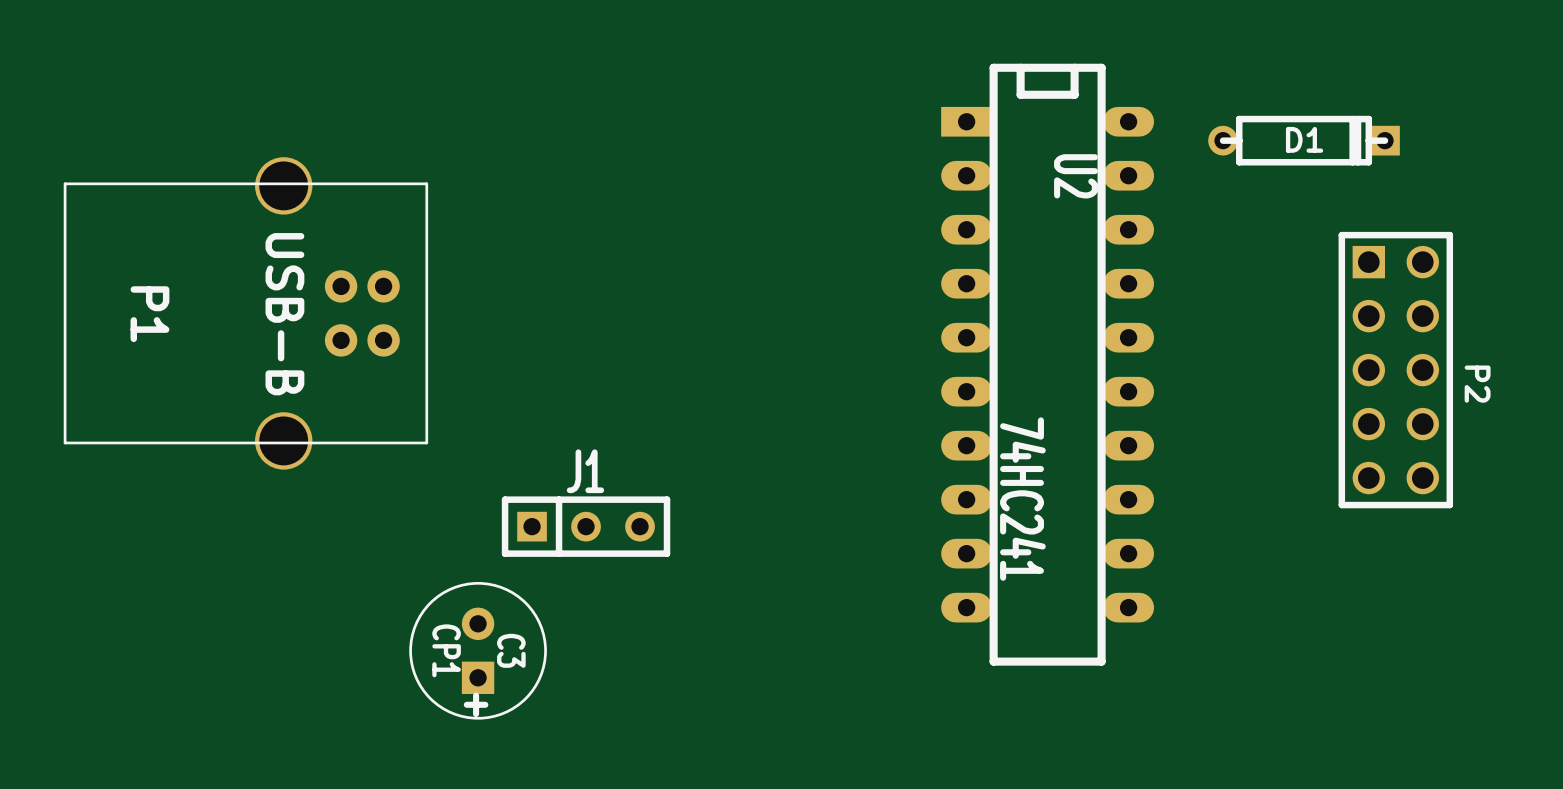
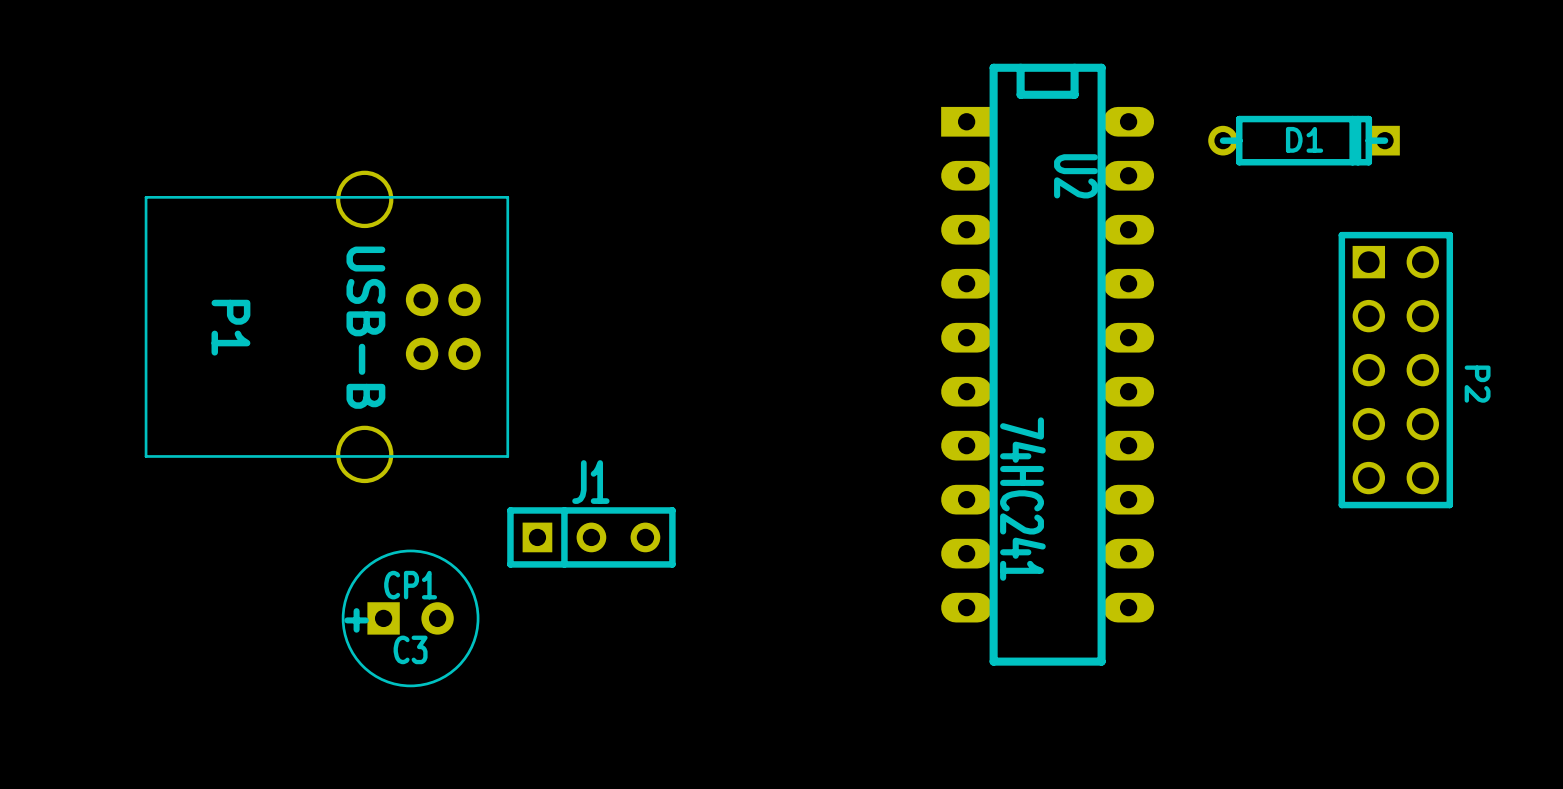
P1 position: (245, 313) -> (326, 326)
J1 position: (586, 526) -> (591, 537)
C3 rotation: 0° (478, 650) -> 90° clockwise (410, 618)

